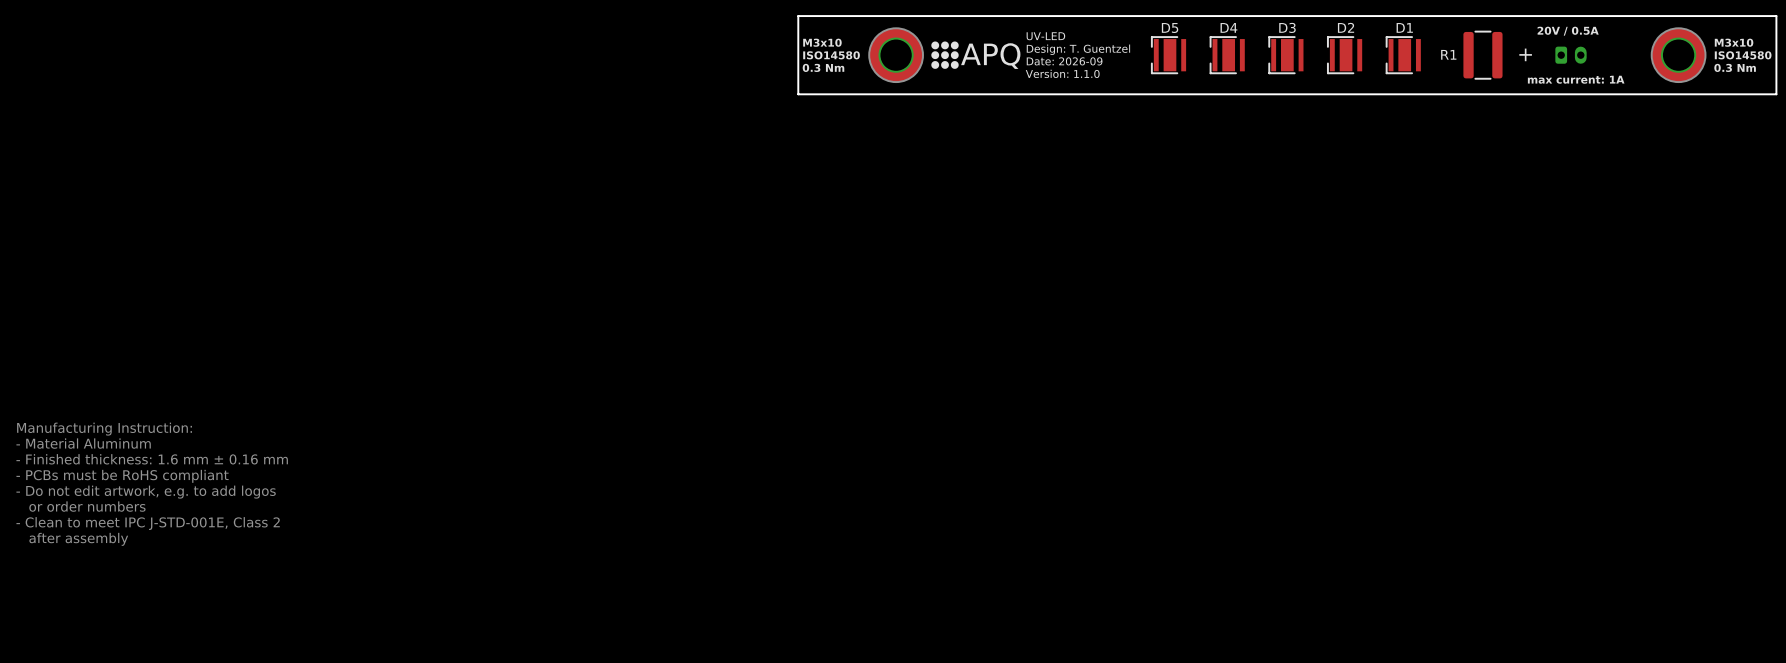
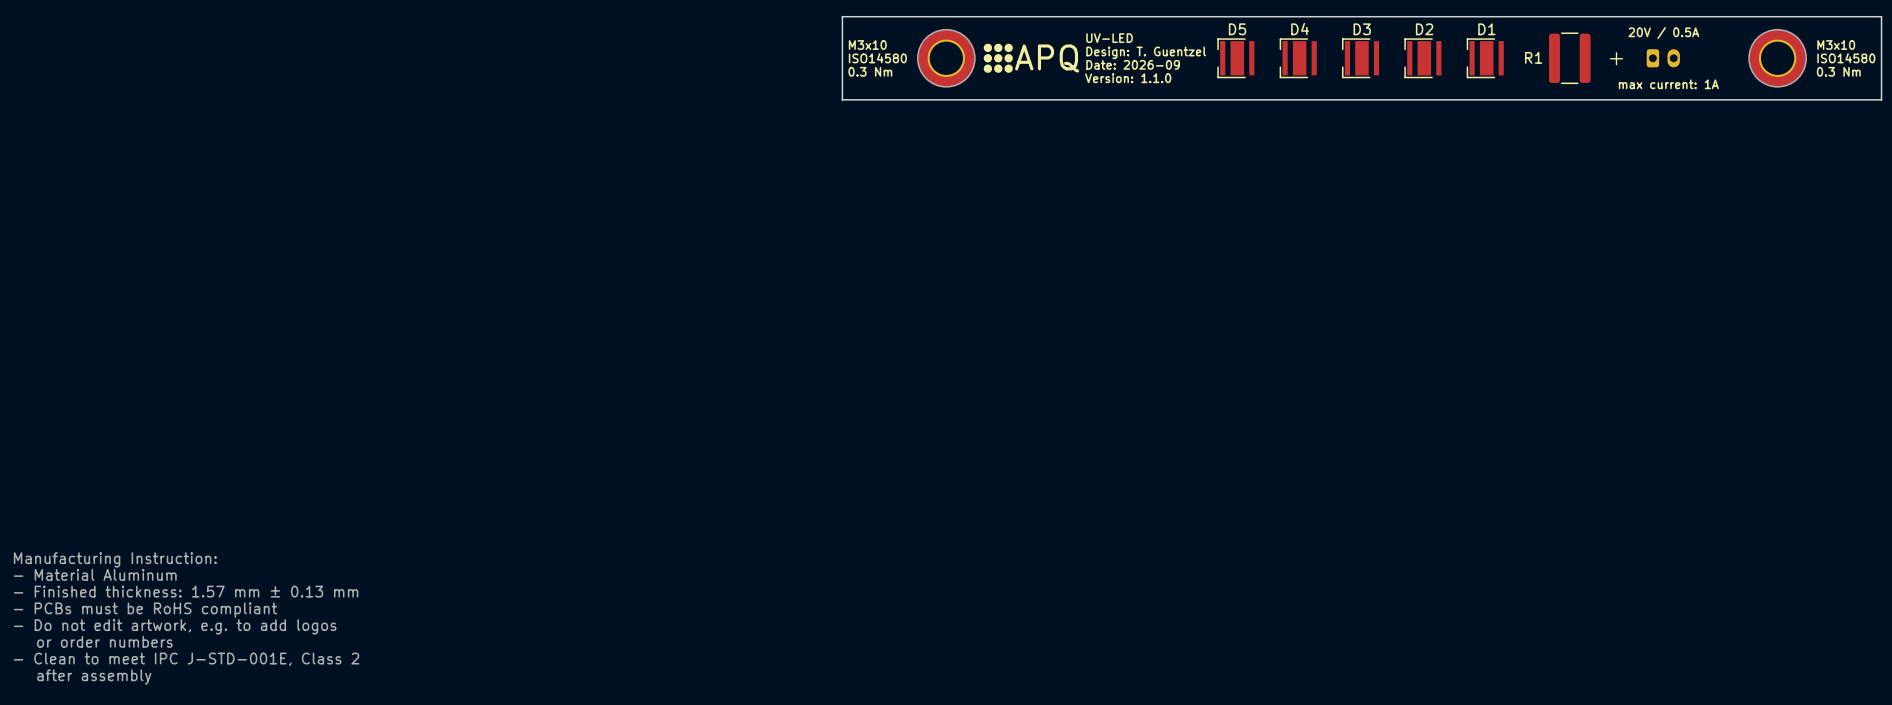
text position: Manufacturing Instruction: (104, 429) -> Manufacturing Instruction: (115, 559)
text position: - Material Aluminum (83, 443) -> - Material Aluminum (95, 574)
text: - Finished thickness: 1.6 mm ± 0.16 mm (152, 459) -> none
text position: - PCBs must be RoHS compliant (122, 476) -> - PCBs must be RoHS compliant (145, 610)
text position: - Do not edit artwork, e.g. to add logos (146, 492) -> - Do not edit artwork, e.g. to add logos (175, 626)
text position: or order numbers (87, 506) -> or order numbers (104, 641)
text position: - Clean to meet IPC J-STD-001E, Class 2 (148, 523) -> - Clean to meet IPC J-STD-001E, Class 2 (186, 659)
text position: after assembly (78, 539) -> after assembly (94, 677)
text: none -> - Finished thickness: 1.57 mm ± 0.13 mm (186, 591)

